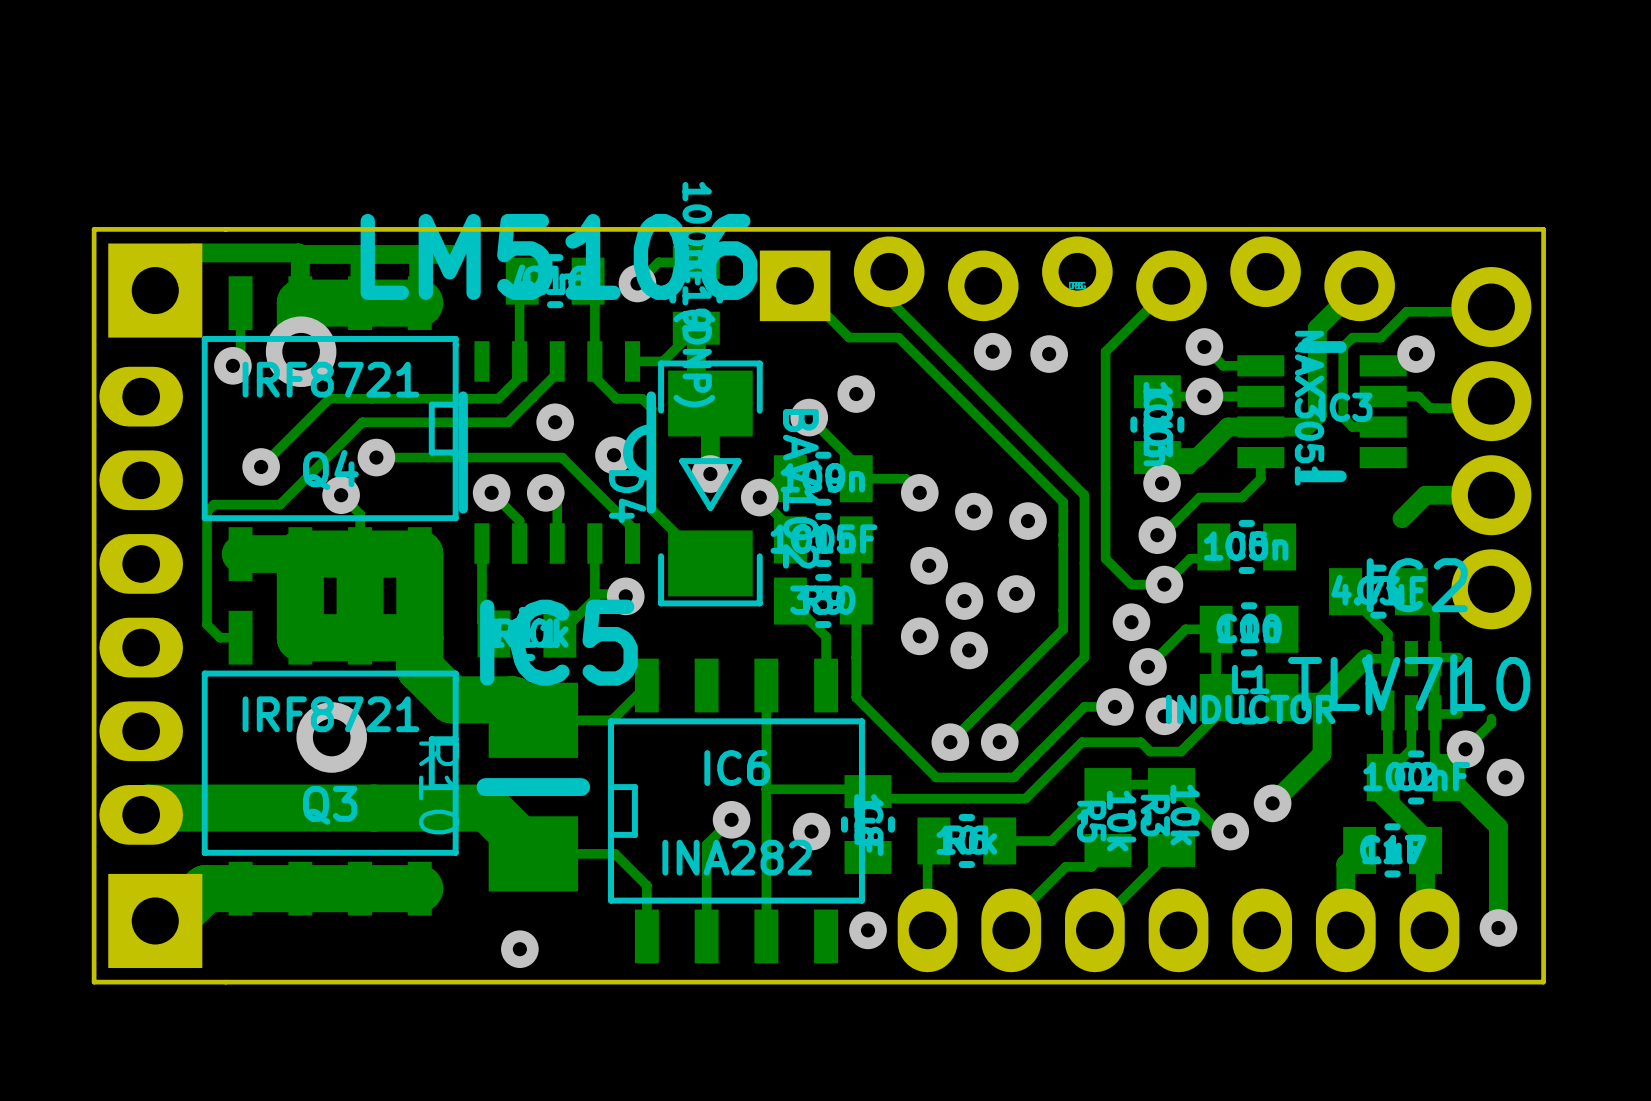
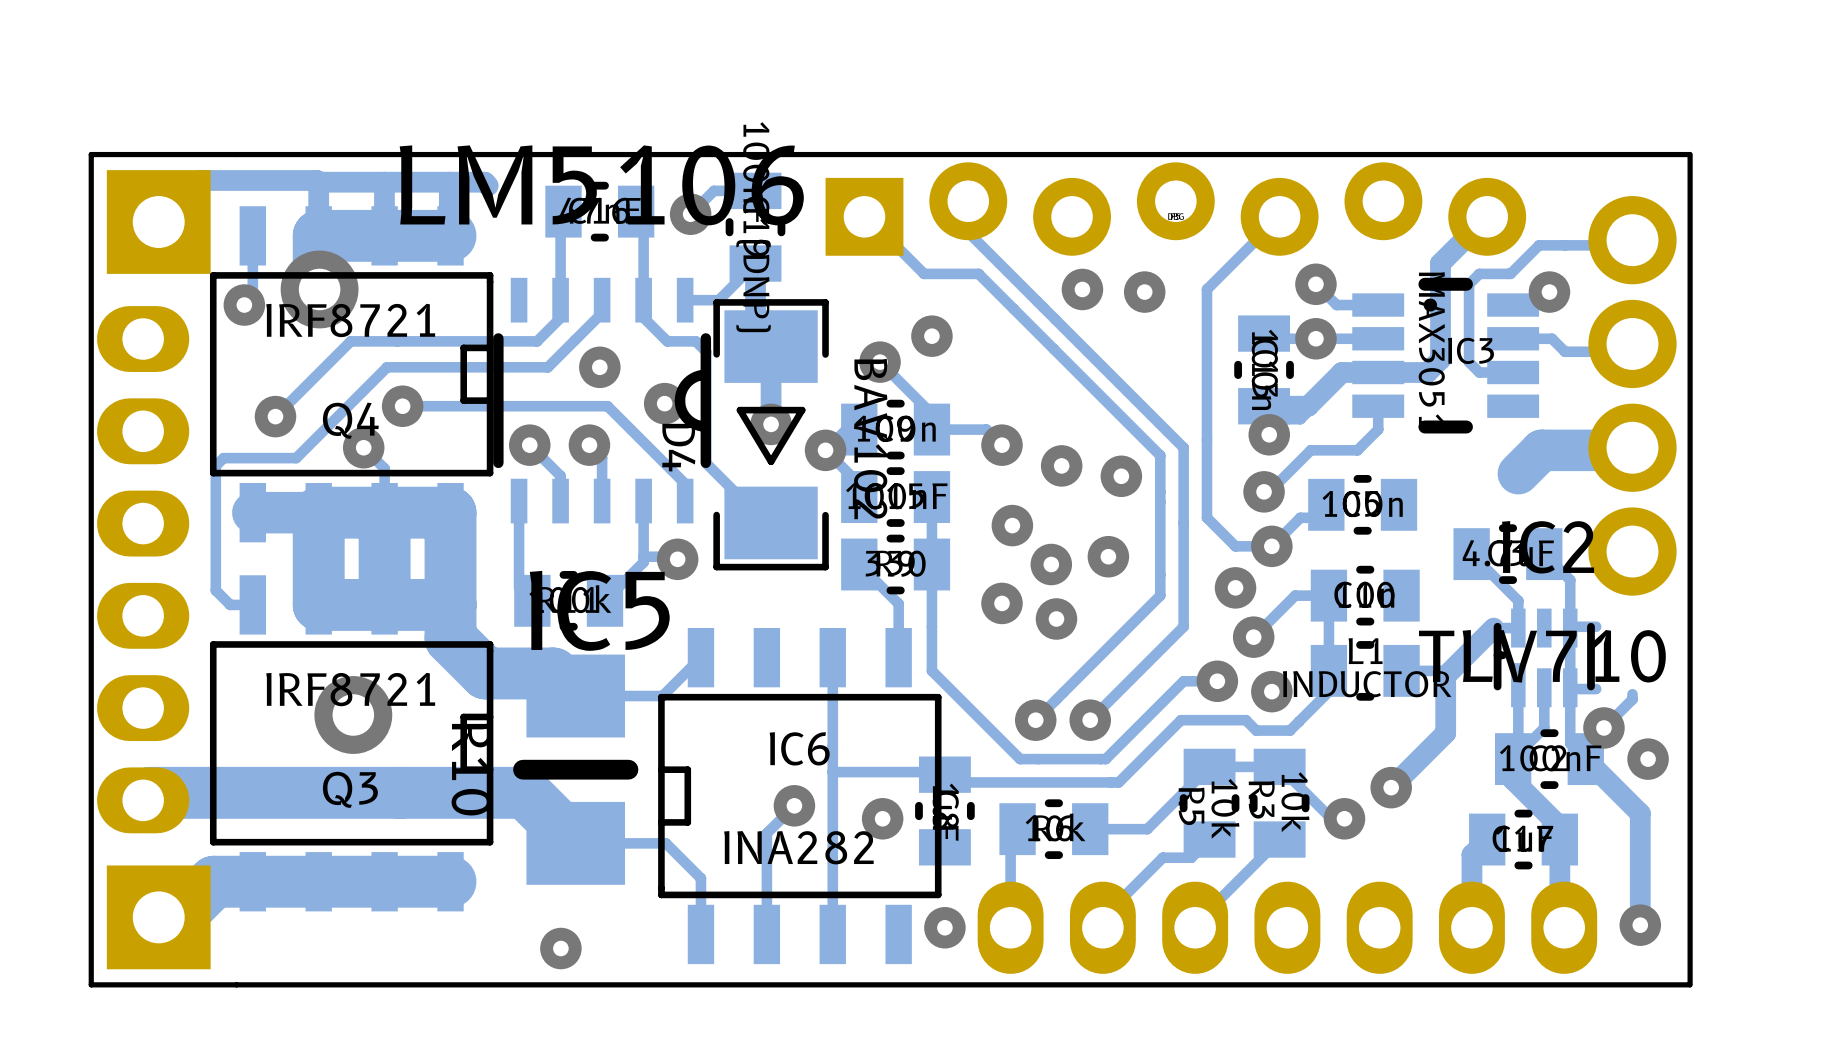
track: (1491, 495) (1425, 495) (1401, 518) -> none
track: none -> (1632, 450) (1541, 450) (1518, 473)

